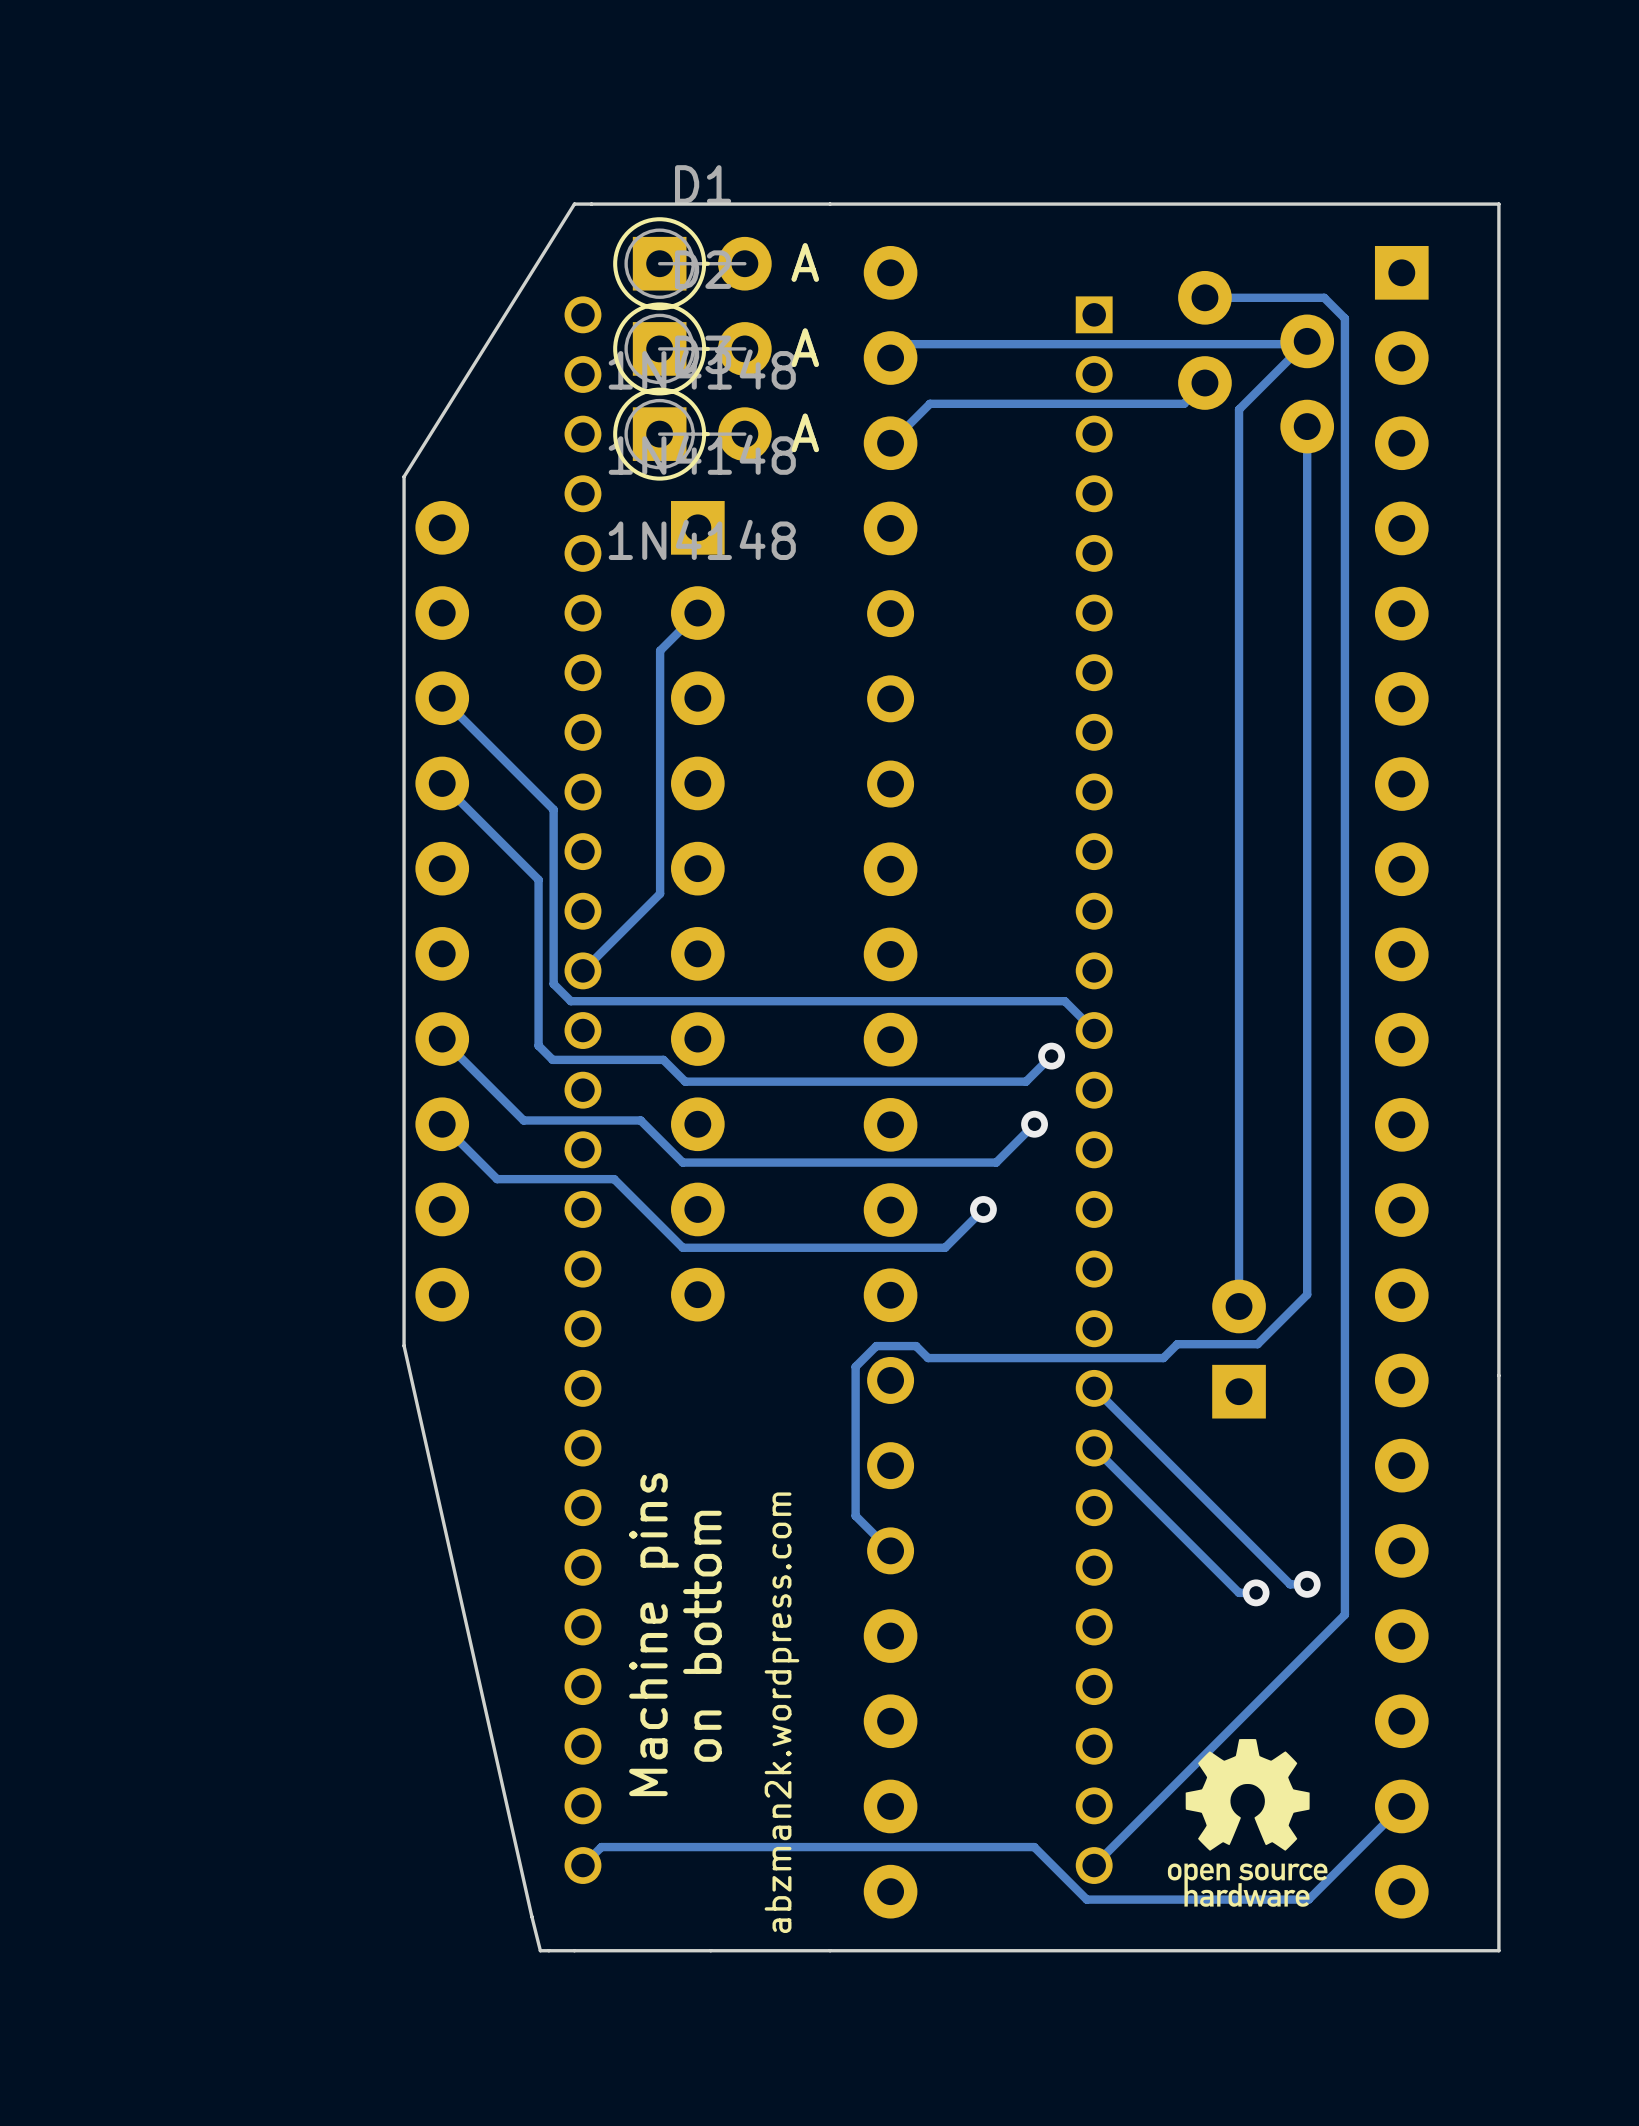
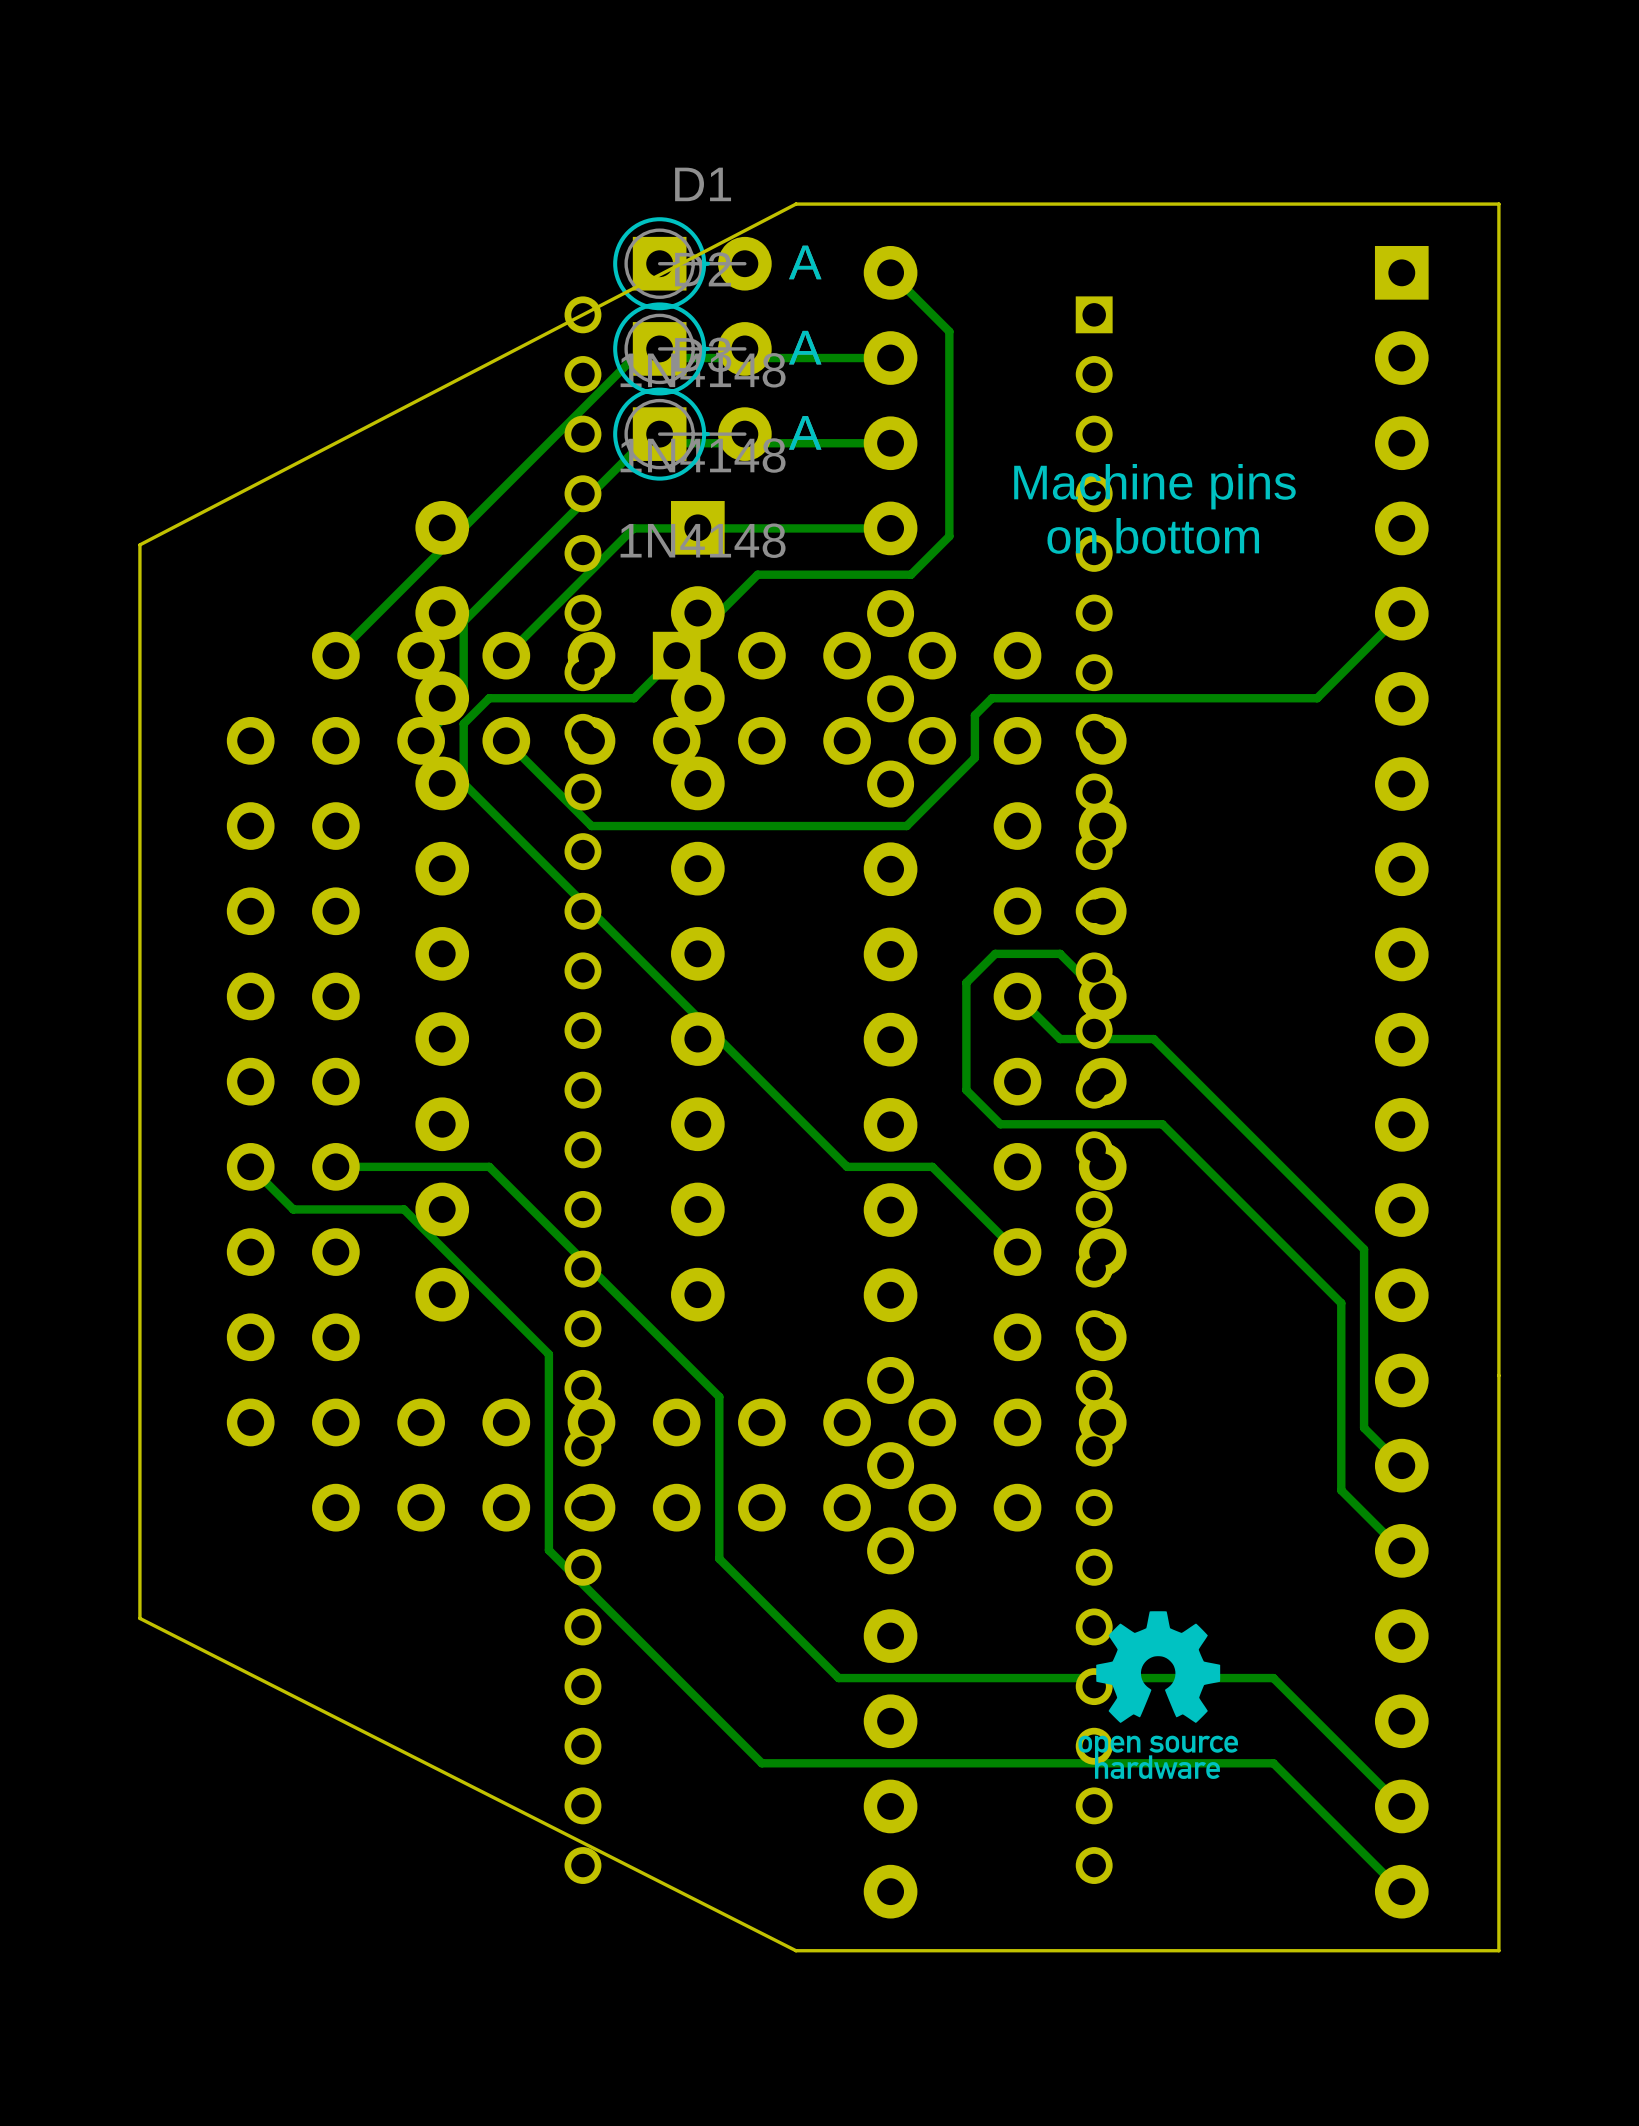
board edge: (795, 204) (574, 204) (404, 476) (404, 1345) (540, 1950) (795, 1950) -> (795, 204) (139, 544) (139, 1618) (795, 1950)
track: none -> (890, 272) (949, 331) (949, 536) (911, 574) (757, 574) (634, 698) (489, 698) (463, 723) (463, 783) (847, 1166) (932, 1166) (1017, 1252)
track: (1204, 297) (1324, 297) (1344, 318) (1344, 1614) (1094, 1865) -> none
part: (1204, 340) -> none
track: (1307, 341) (1239, 409) (1239, 1306) -> none
track: (1304, 344) (904, 344) (890, 358) -> (335, 655) (633, 358) (890, 358)
track: (1204, 383) (1184, 403) (929, 403) (890, 443) -> (421, 740) (463, 698) (463, 621) (642, 443) (890, 443)
part: (1307, 383) -> none
track: (1307, 426) (1307, 1294) (1257, 1344) (1177, 1344) (1163, 1358) (928, 1358) (916, 1346) (876, 1346) (855, 1366) (855, 1515) (890, 1550) -> none
text: none -> Machine pins (1154, 486)
track: none -> (890, 528) (633, 528) (506, 655)
text: none -> on bottom (1153, 535)
track: (697, 613) (660, 650) (660, 893) (582, 970) -> none
track: none -> (1401, 613) (1317, 698) (991, 698) (974, 715) (974, 757) (906, 826) (591, 826) (506, 740)
track: (442, 698) (553, 809) (553, 984) (570, 1001) (1064, 1001) (1094, 1030) -> none
track: (442, 783) (538, 879) (538, 1045) (552, 1059) (663, 1059) (685, 1081) (1026, 1081) (1051, 1056) -> none
track: none -> (1017, 996) (1060, 1039) (1153, 1039) (1364, 1249) (1364, 1427) (1401, 1465)
track: none -> (1102, 996) (1060, 953) (995, 953) (966, 982) (966, 1090) (1000, 1124) (1162, 1124) (1341, 1303) (1341, 1490) (1401, 1550)
track: (442, 1039) (523, 1120) (640, 1120) (682, 1162) (996, 1162) (1034, 1124) -> none
via: (1051, 1056) -> none
part: none -> (676, 1081)
track: (442, 1124) (497, 1179) (614, 1179) (682, 1247) (945, 1247) (983, 1209) -> none
via: (1034, 1124) -> none
track: none -> (250, 1166) (293, 1209) (404, 1209) (548, 1354) (548, 1550) (761, 1763) (1273, 1763) (1401, 1891)
via: (983, 1209) -> none
part: (1239, 1349) -> none
track: (1094, 1388) (1290, 1584) (1307, 1584) -> none
track: (1094, 1448) (1239, 1592) (1256, 1592) -> none
via: (1307, 1584) -> none
via: (1256, 1592) -> none
text: Machine pins (654, 1634) -> none
text: on bottom (702, 1636) -> none
text: abzman2k.wordpress.com (781, 1712) -> none
track: (1401, 1806) (1308, 1899) (1086, 1899) (1034, 1847) (601, 1847) (582, 1865) -> (1401, 1806) (1273, 1678) (838, 1678) (719, 1558) (719, 1396) (489, 1166) (335, 1166)
drawing position: (1247, 1822) -> (1158, 1695)

